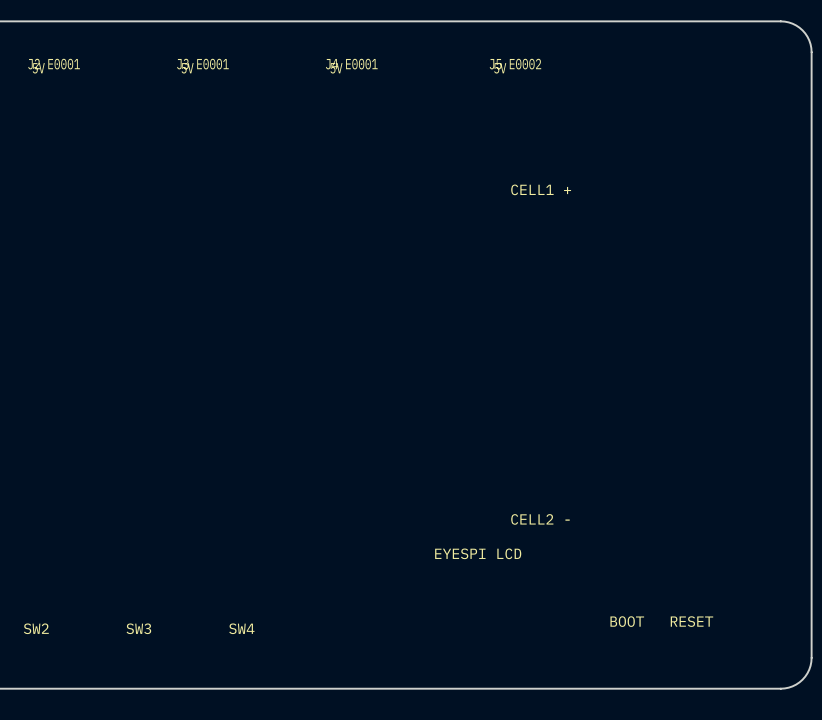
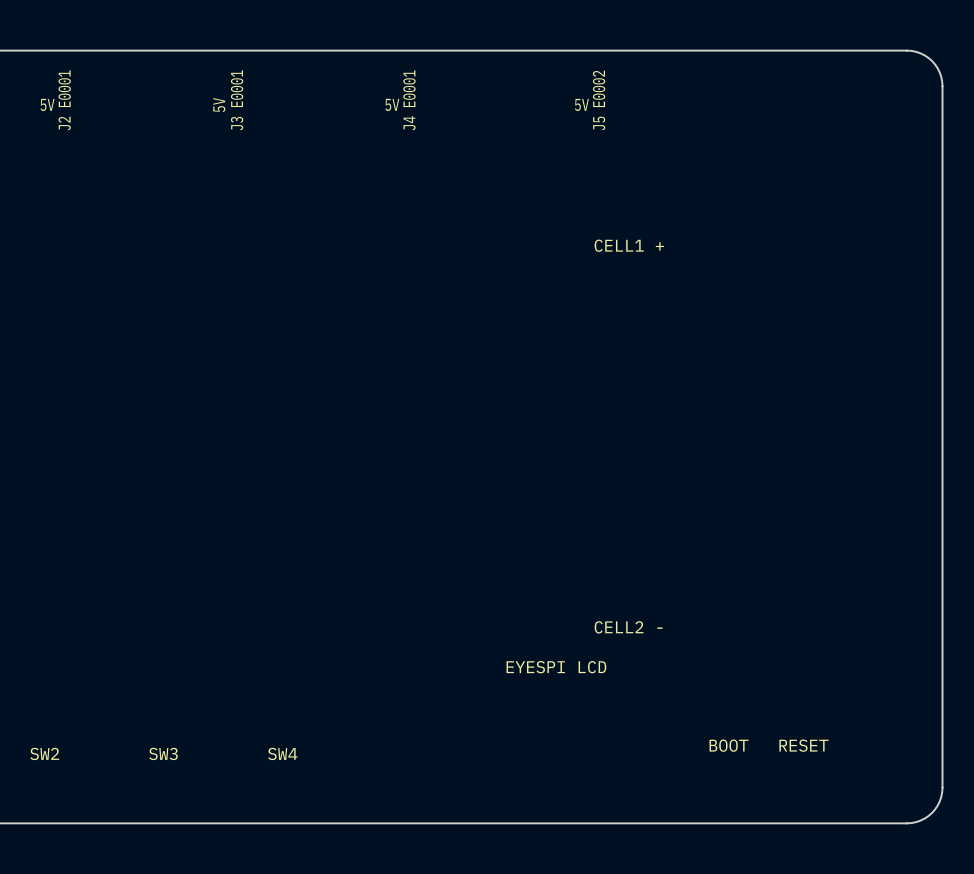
text rotation: 0° (54, 64) -> 90° counterclockwise (64, 100)
text rotation: 0° (202, 64) -> 90° counterclockwise (237, 100)
text rotation: 0° (351, 64) -> 90° counterclockwise (409, 100)
text rotation: 0° (515, 64) -> 90° counterclockwise (599, 100)
text rotation: 0° (187, 68) -> 90° counterclockwise (219, 105)

